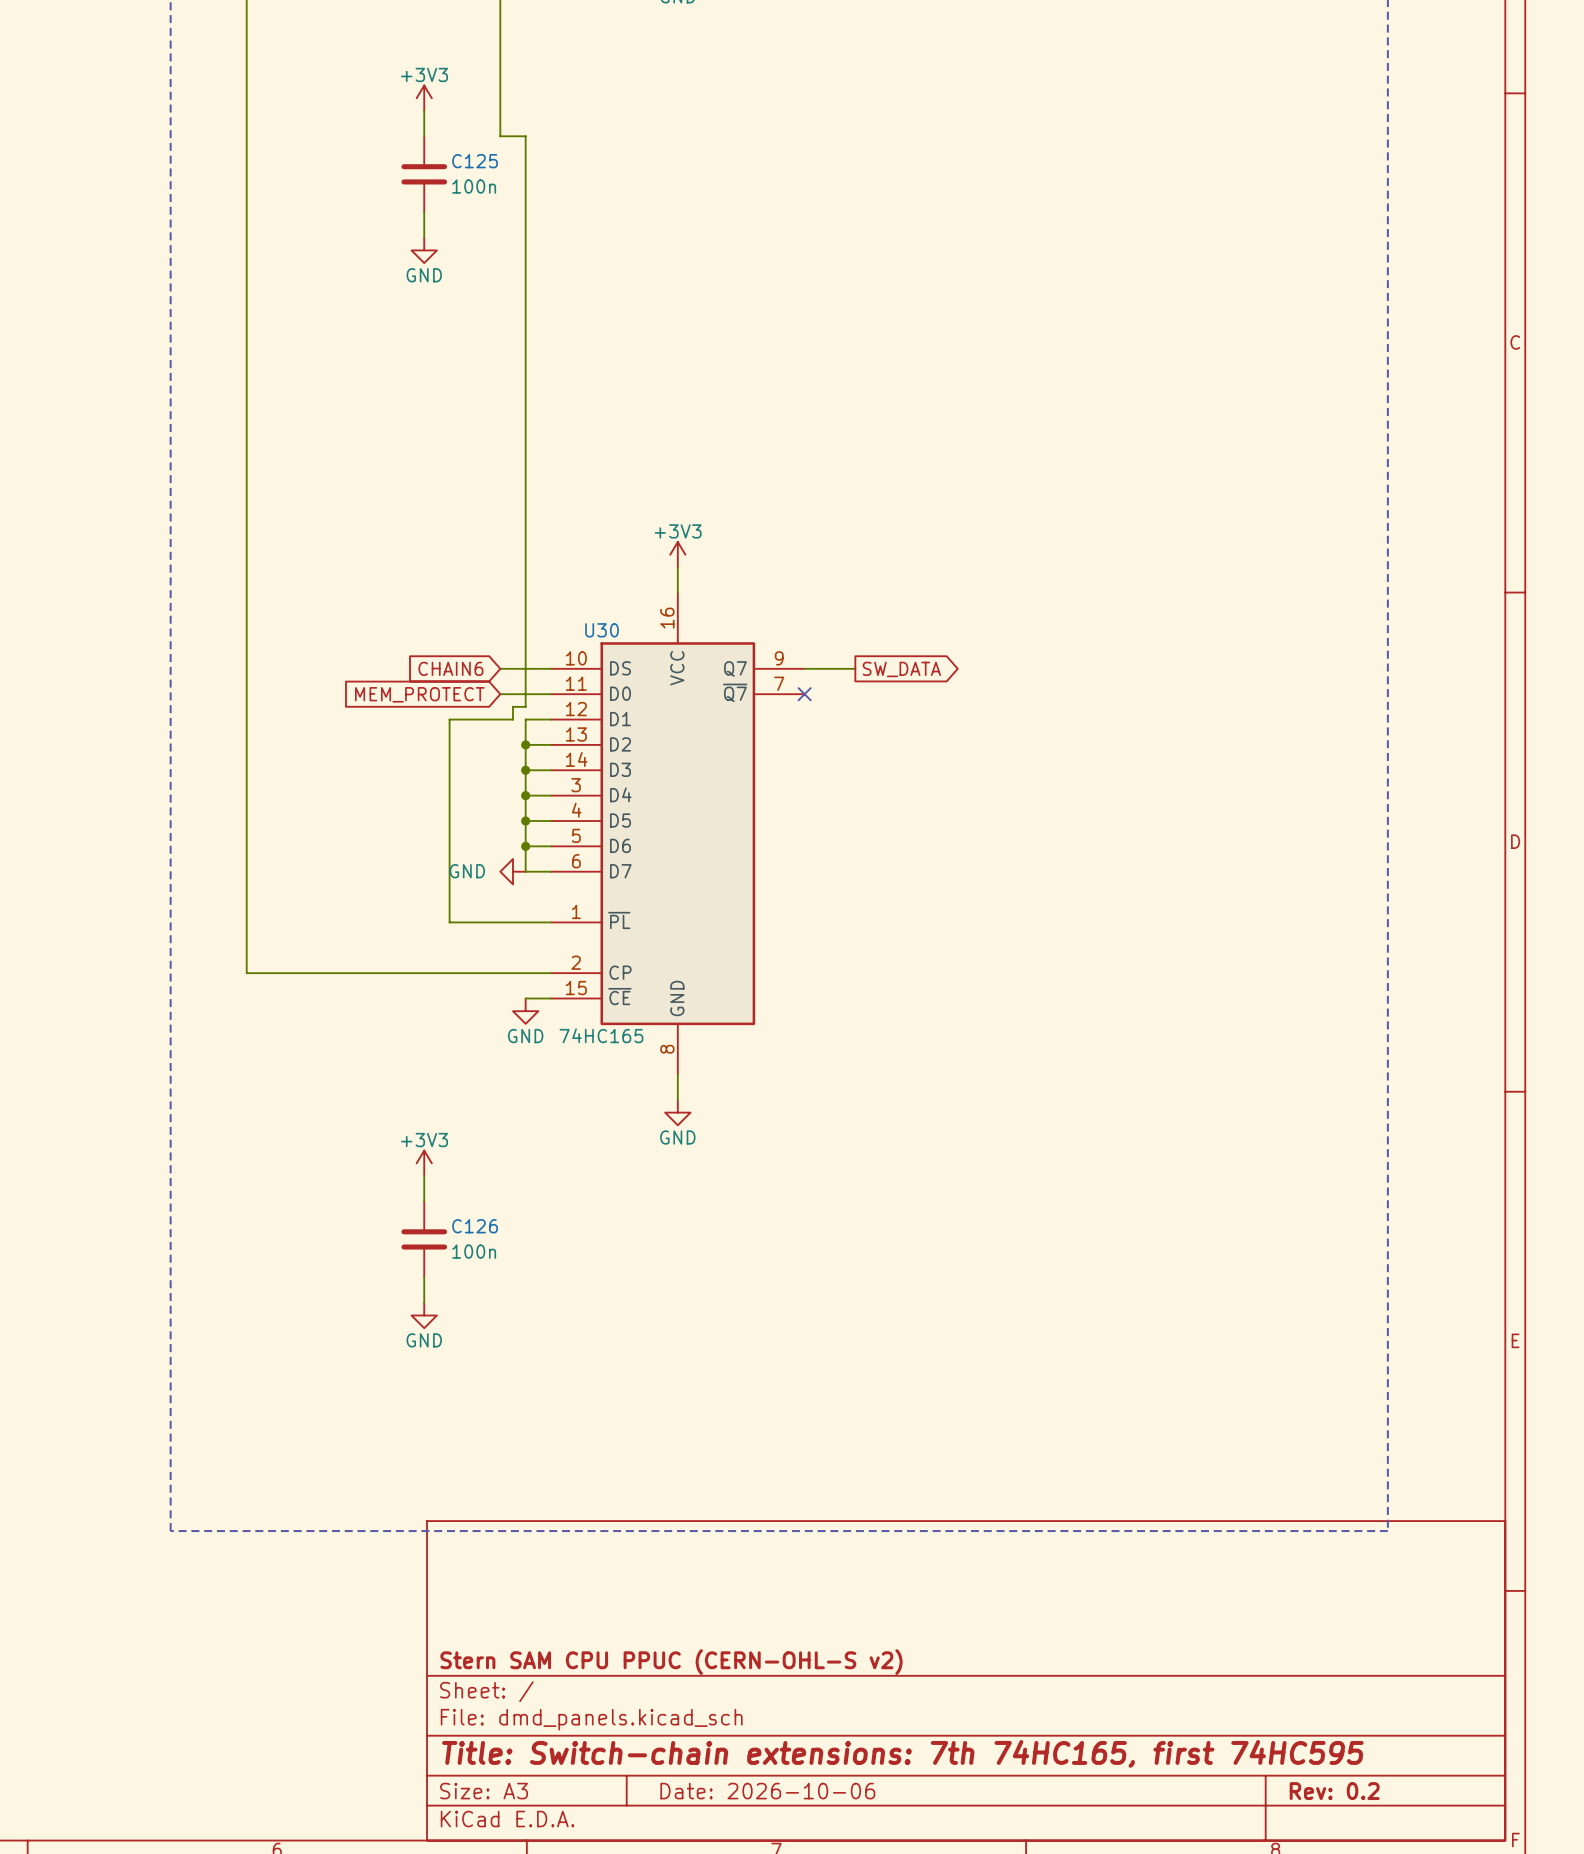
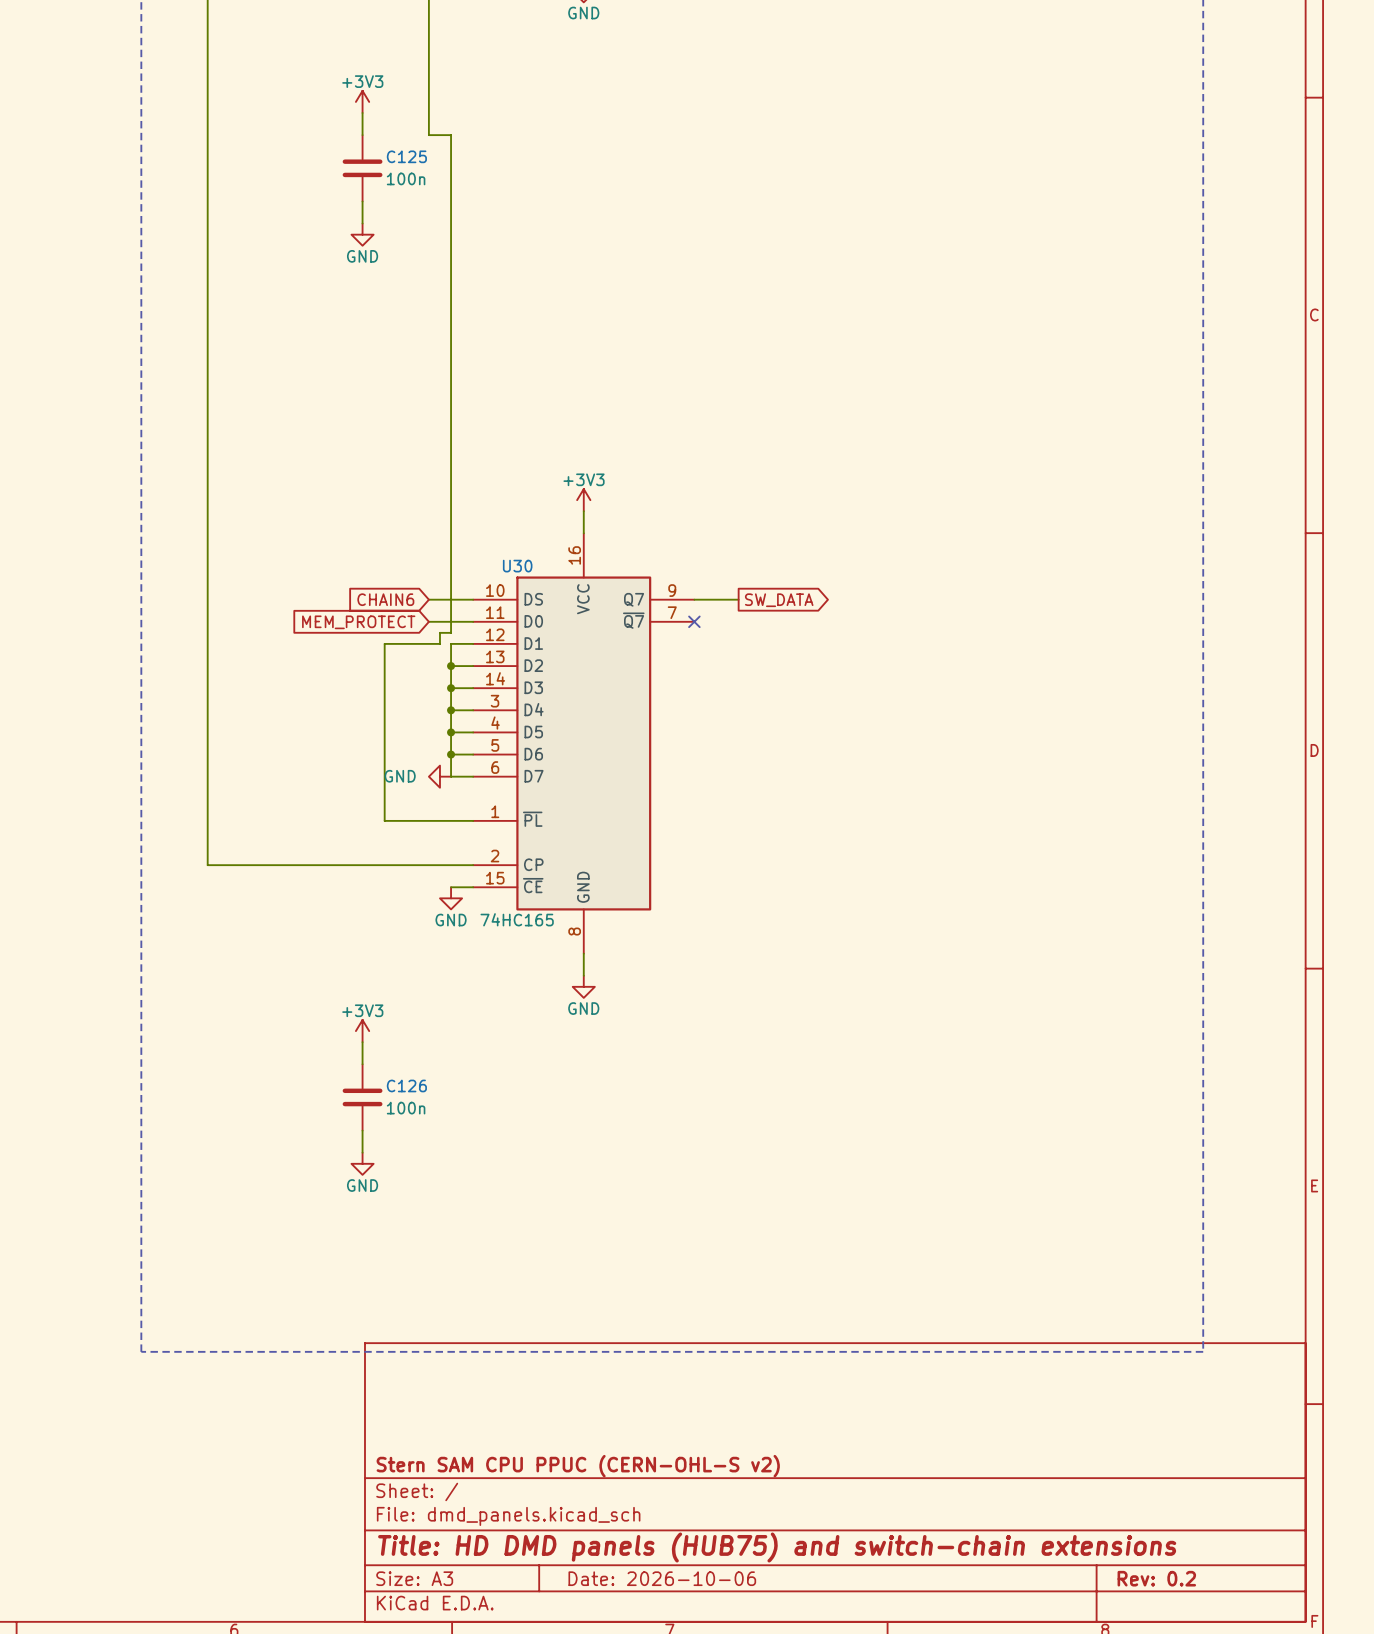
title block: Title: Switch-chain extensions: 7th 74HC165, first 74HC595 (902, 1753) -> Title: HD DMD panels (HUB75) and switch-chain extensions (777, 1547)

